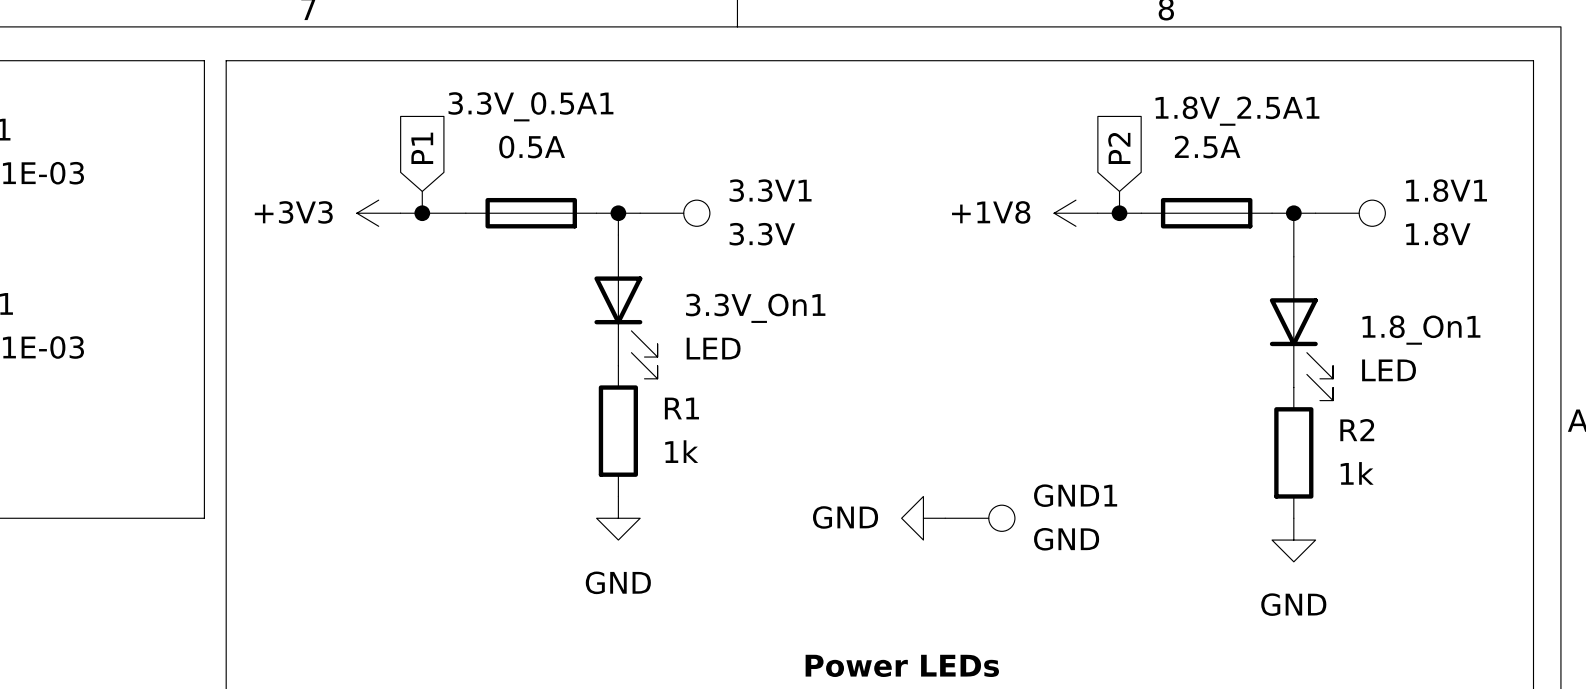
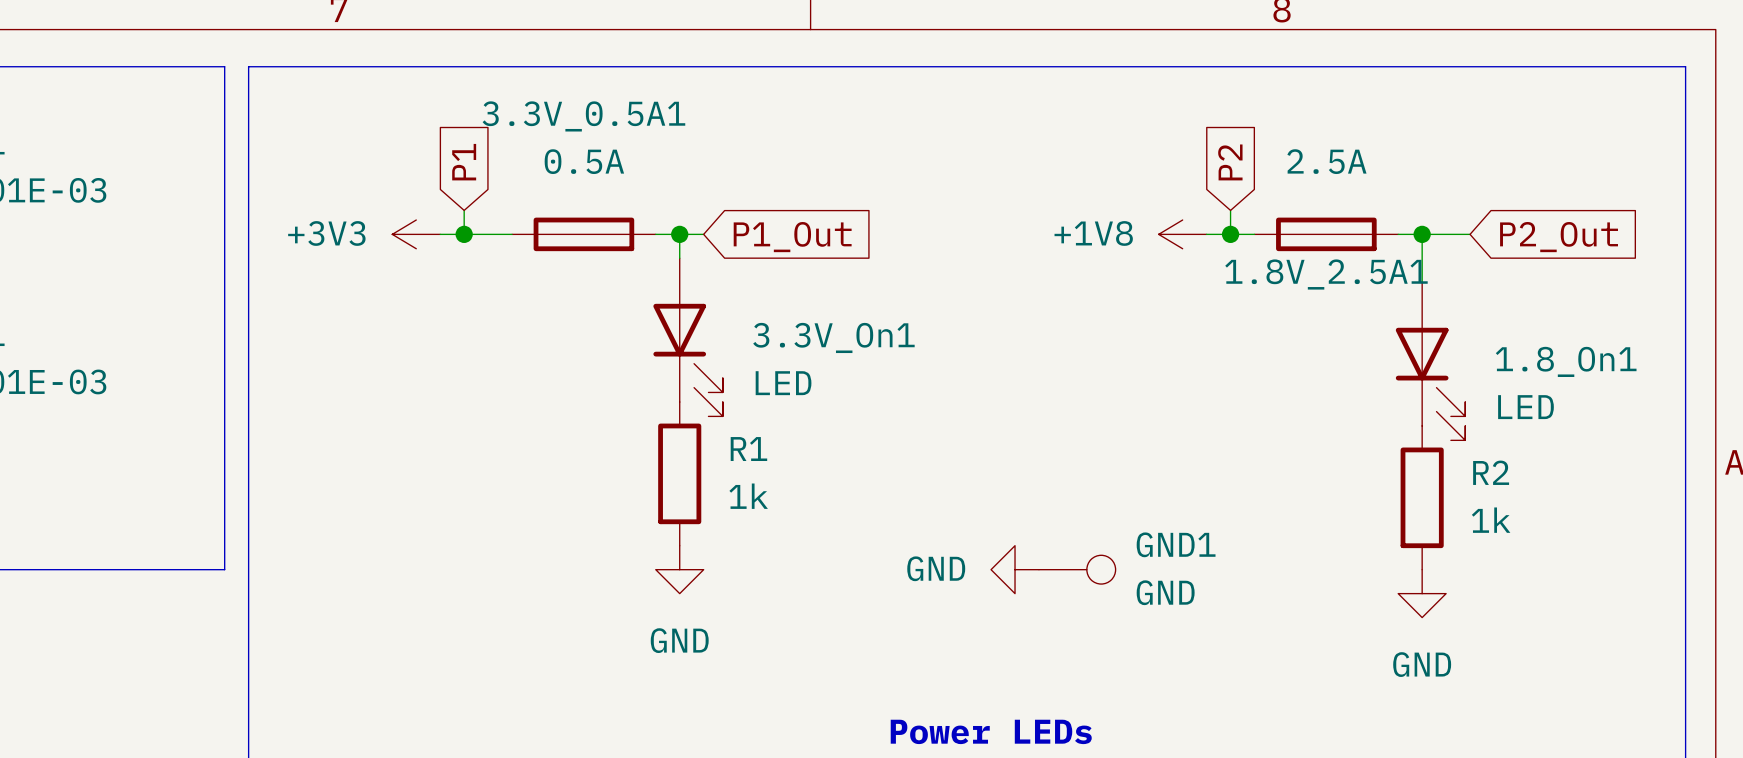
1.8V_2.5A1 name position: 1.8V_2.5A1 (1237, 111) -> 1.8V_2.5A1 (1326, 274)
3.3V1: 3.3V (675, 213) -> none
1.8V1: 1.8V (1350, 213) -> none
global label: none -> P1_Out (792, 237)
global label: none -> P2_Out (1559, 237)

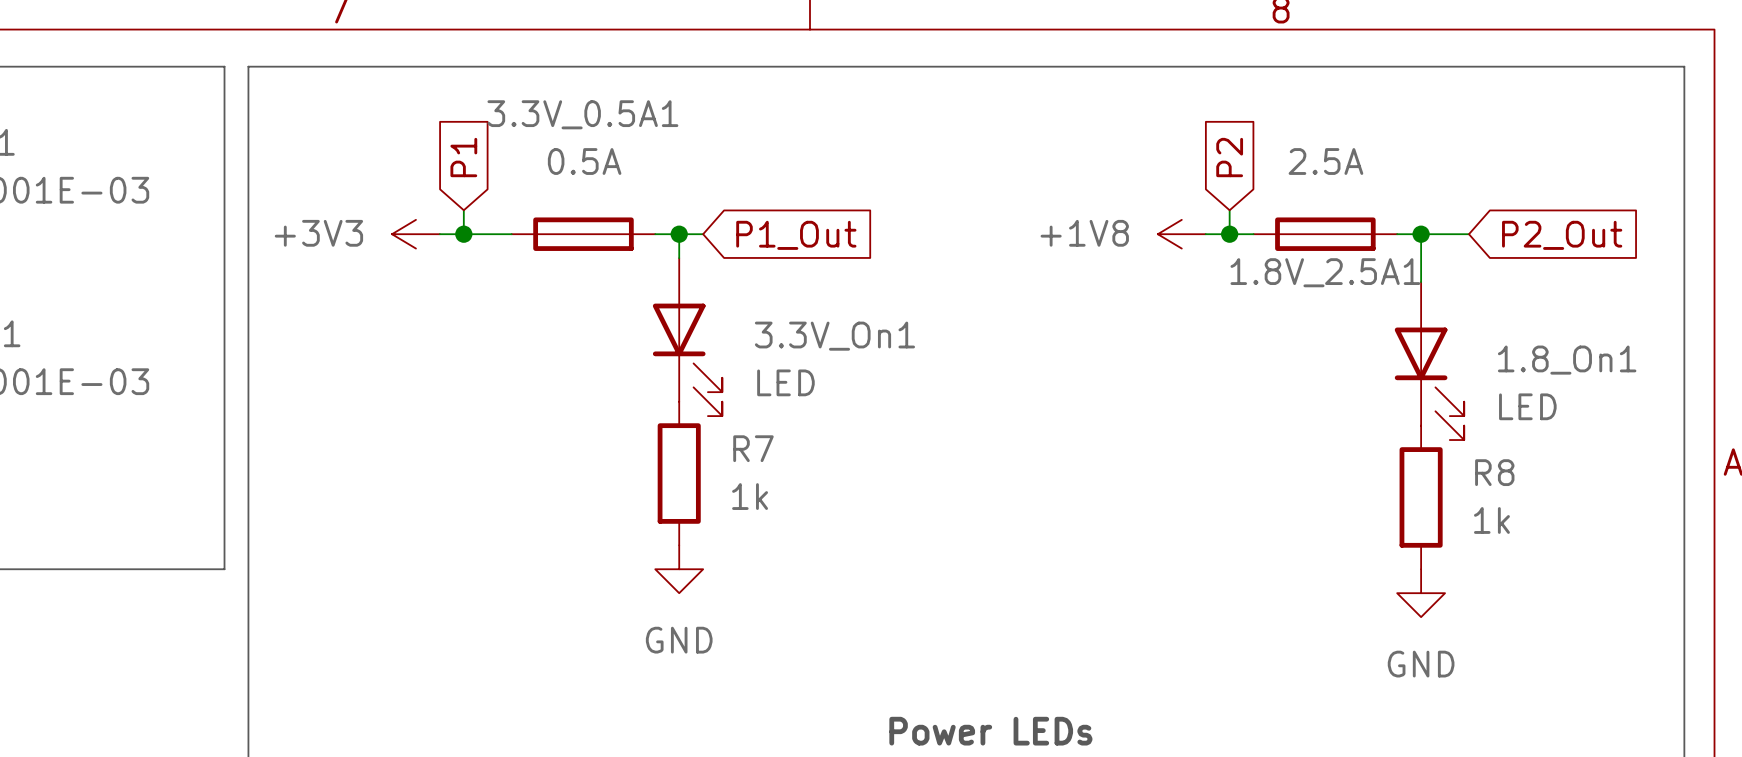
R1 name: R1 (748, 449) -> R7 (753, 448)
R2 name: R2 (1491, 472) -> R8 (1494, 472)
power symbol: GND (1015, 569) -> none
GND1: GND (1077, 569) -> none

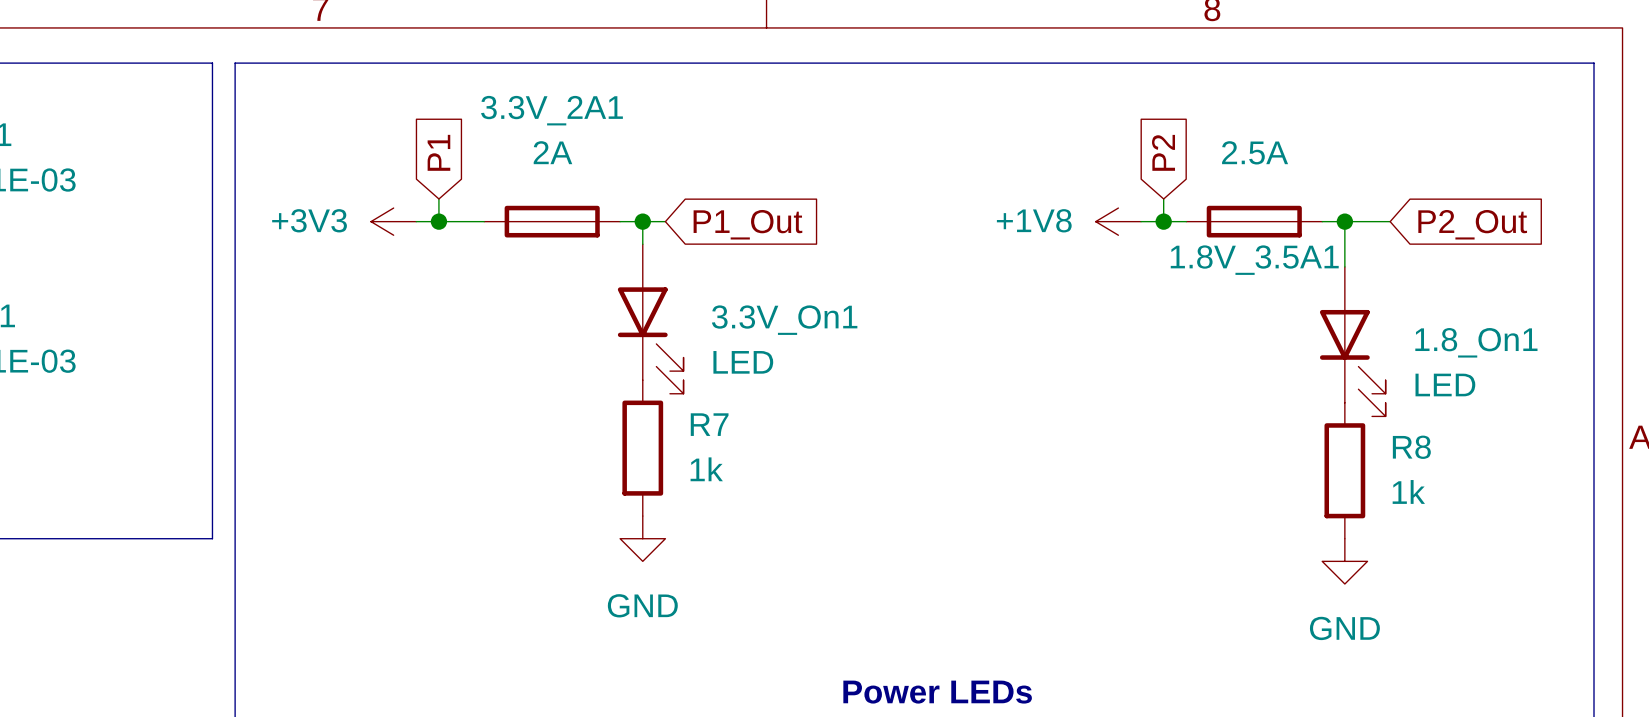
3.3V_0.5A1 name: 3.3V_0.5A1 (582, 114) -> 3.3V_2A1 (552, 110)
3.3V_0.5A1 value: 0.5A (584, 161) -> 2A (552, 152)
1.8V_2.5A1 name: 1.8V_2.5A1 (1325, 272) -> 1.8V_3.5A1 (1254, 260)

